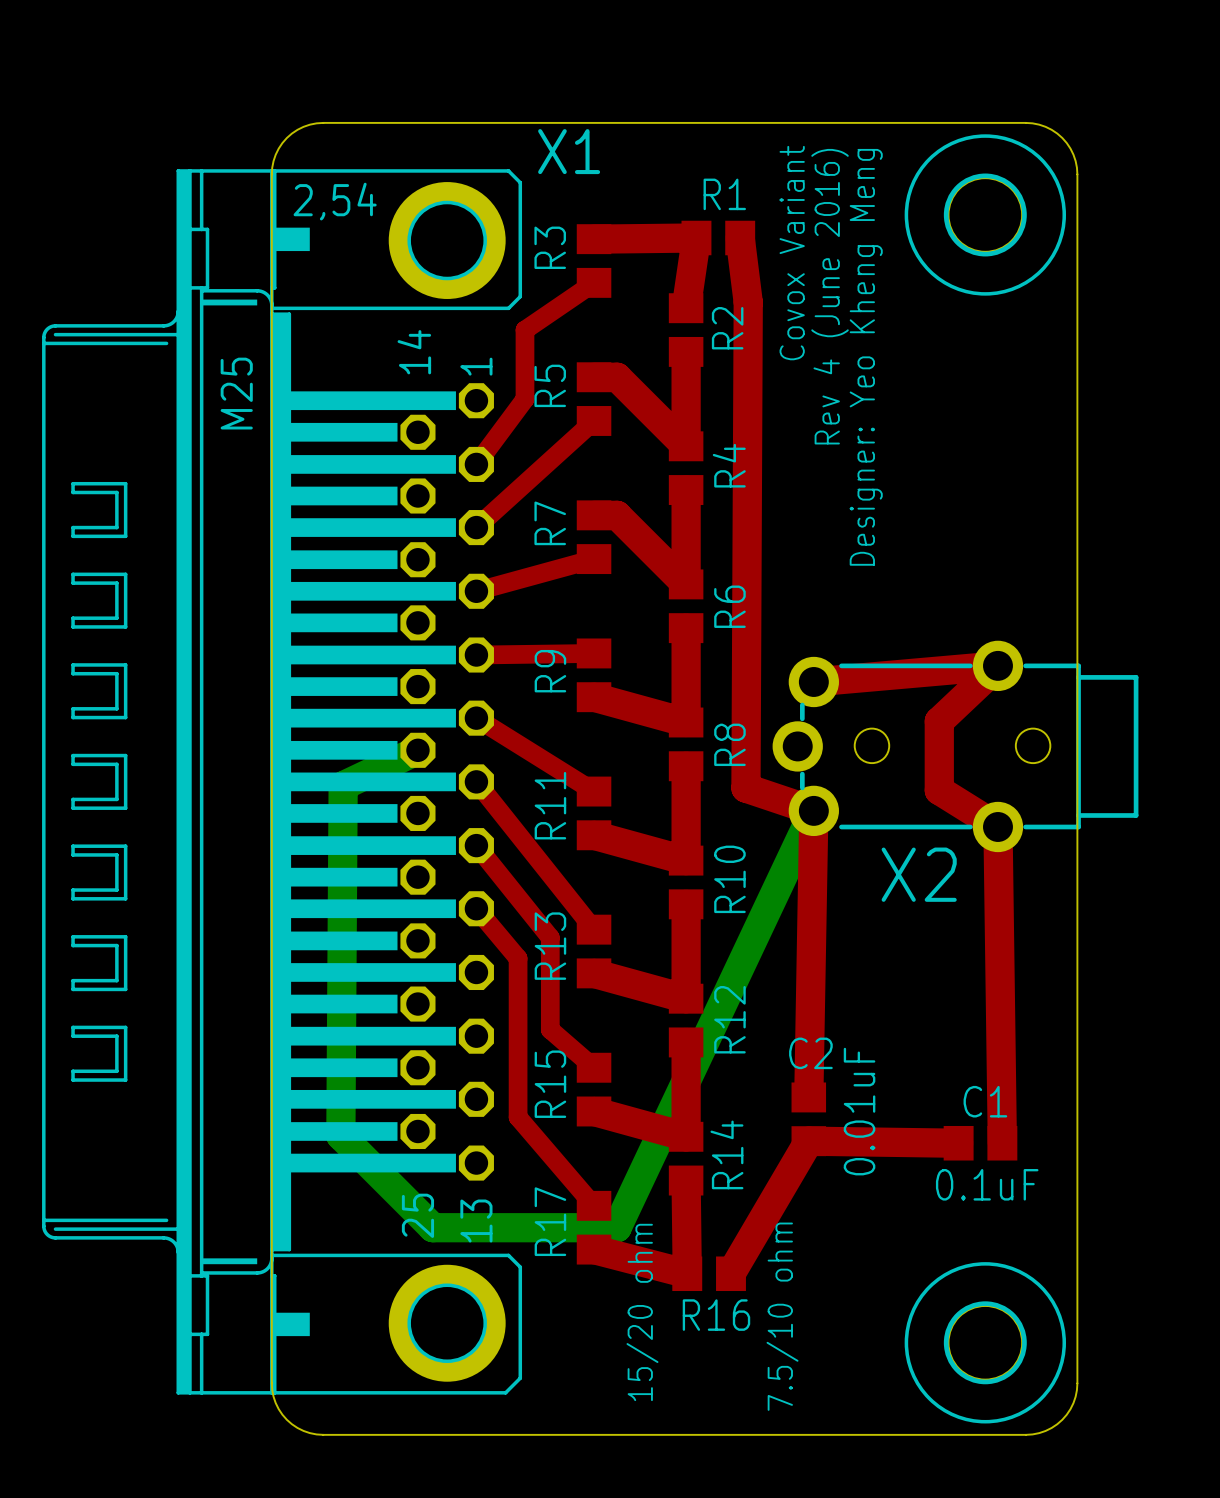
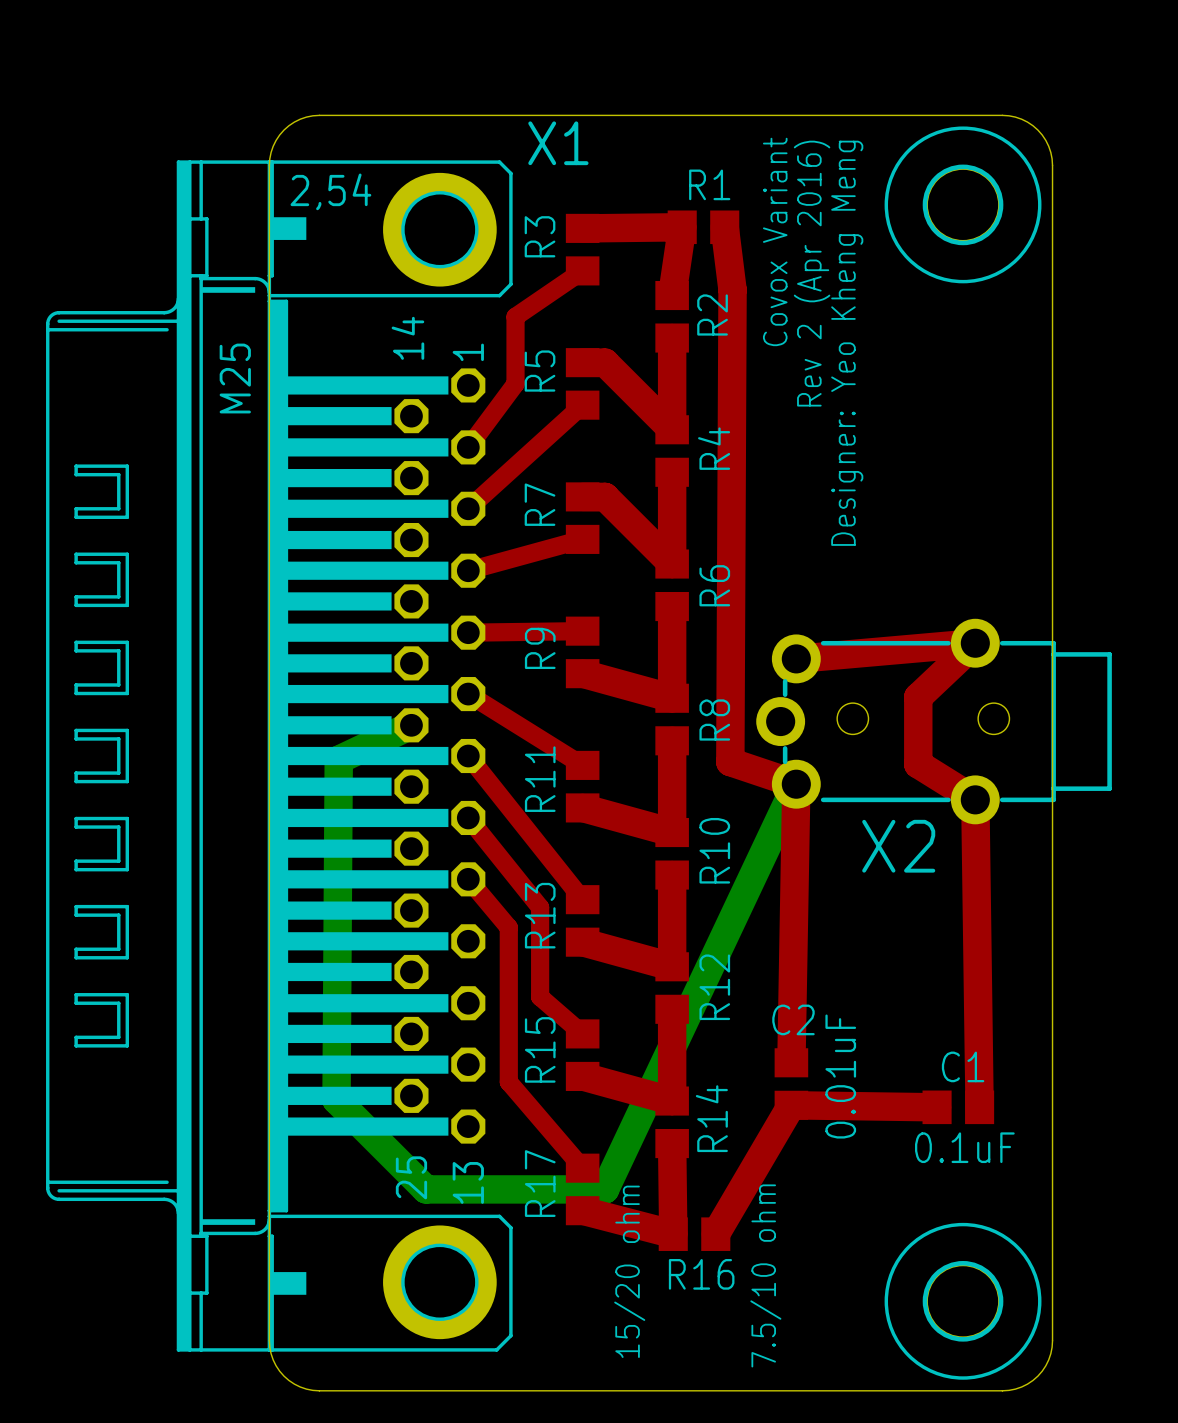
text: Rev 4 (June 2016) (830, 296) -> Rev 2 (Apr 2016) (812, 273)
X2 footprint: [772, 640, 1139, 853] -> [756, 618, 1112, 825]

